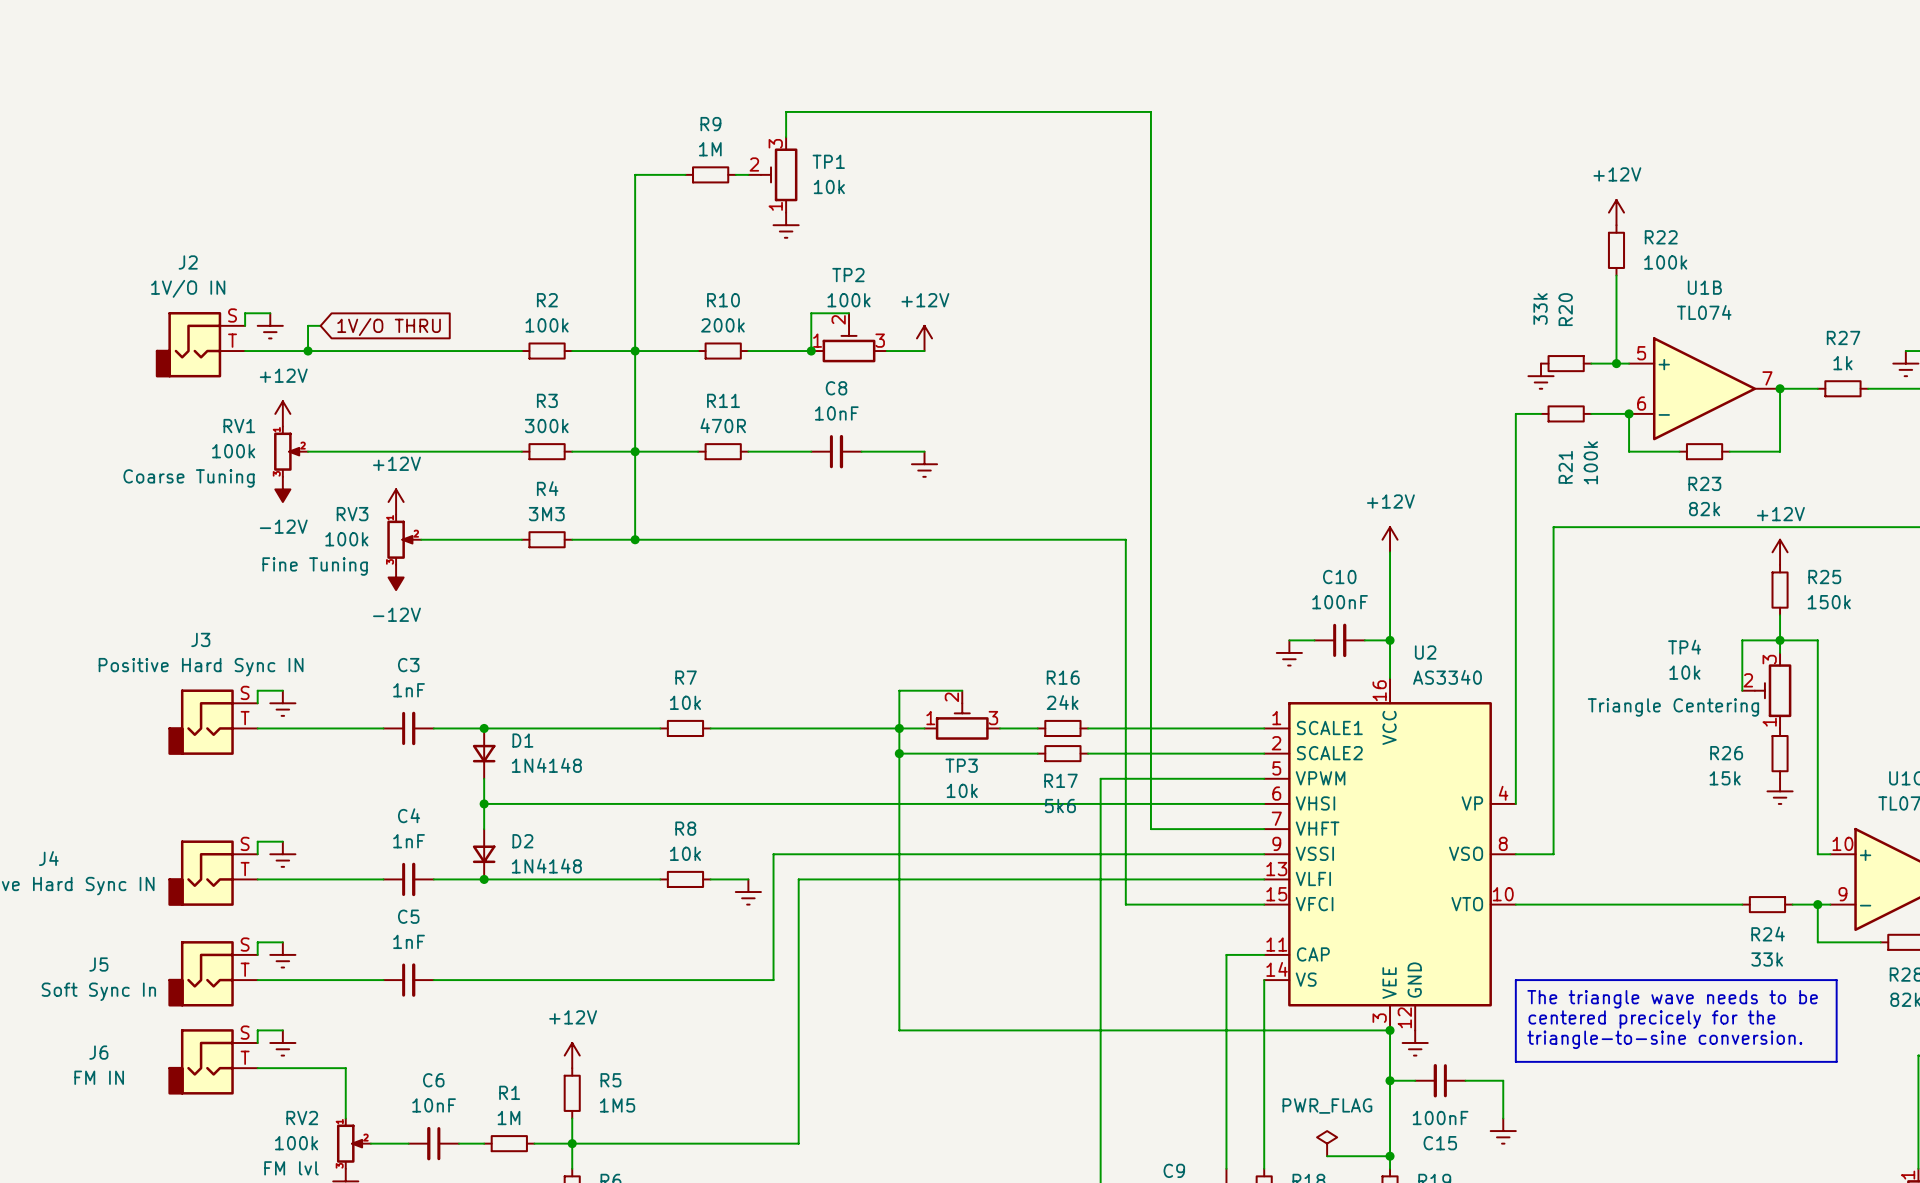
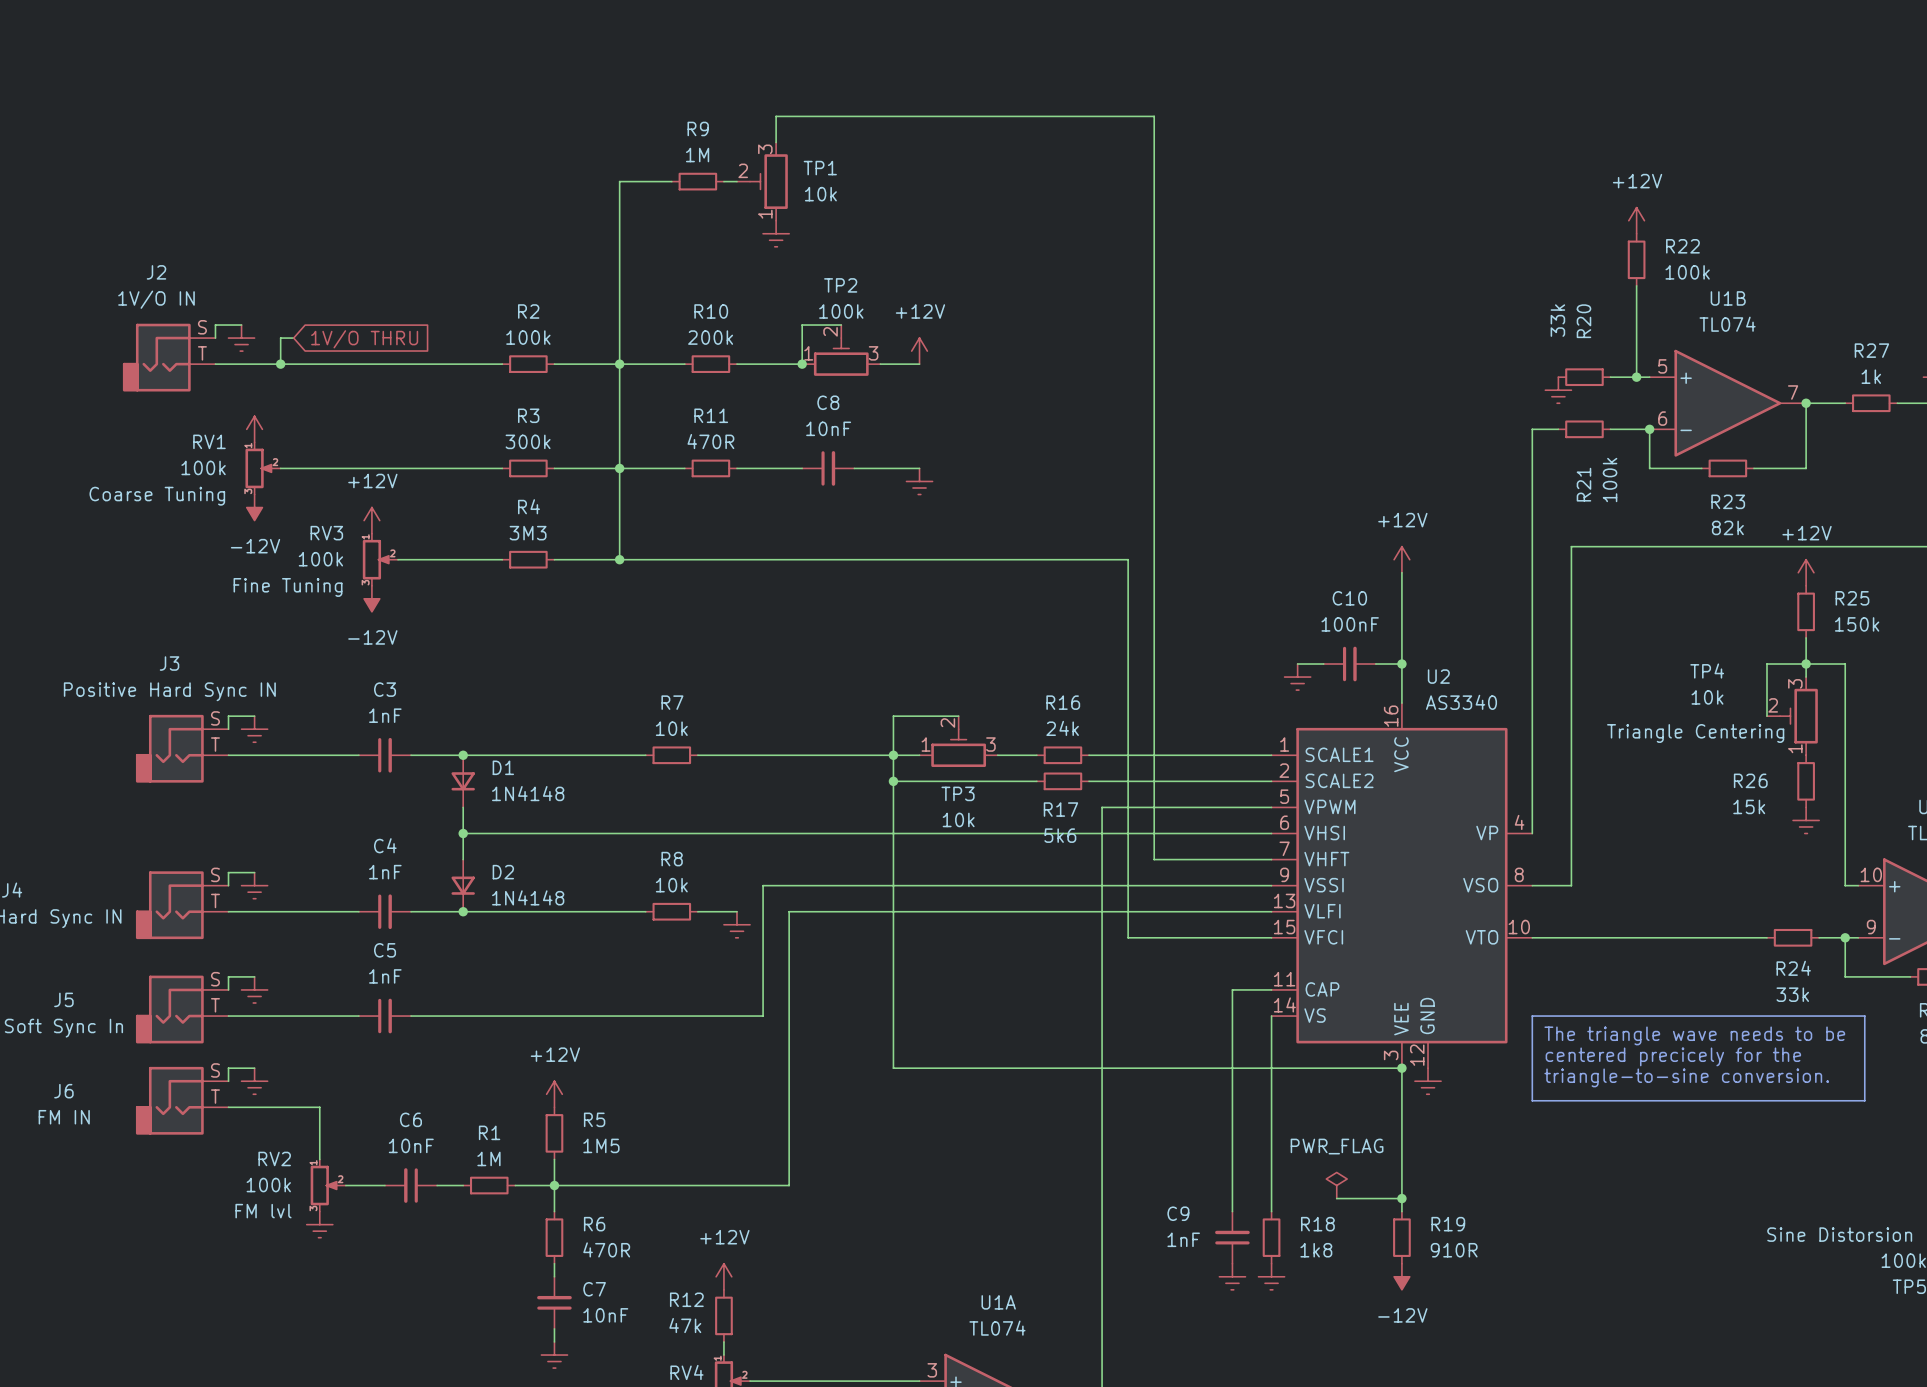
power symbol text: +12V (283, 375) -> none
wire: (1390, 1080) (1415, 1080) -> none
junction: (1390, 1080) -> none
C15: 100nF (1440, 1080) -> none
wire: (1465, 1080) (1503, 1080) (1503, 1118) -> none
power symbol: (1503, 1131) -> none

